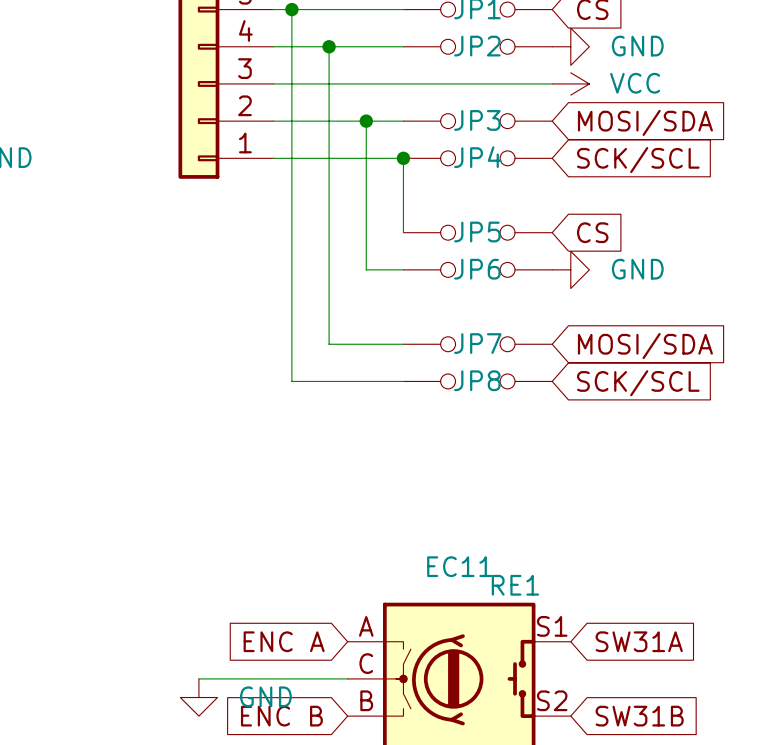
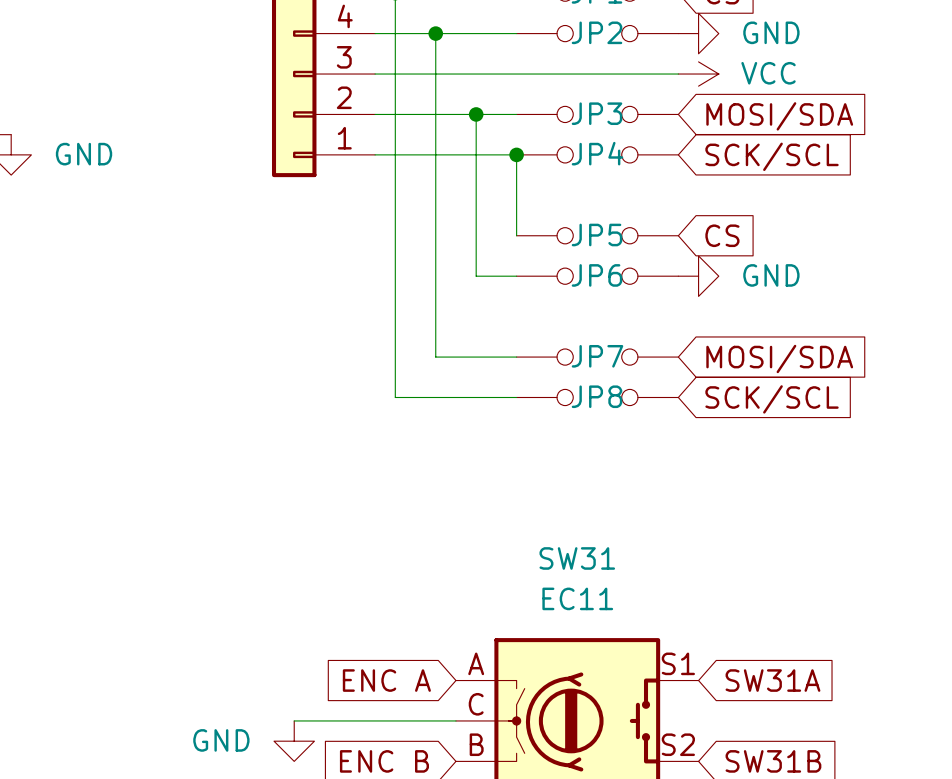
RE1 name: RE1 (515, 585) -> SW31 (577, 558)
power symbol text position: GND (265, 696) -> GND (221, 740)

